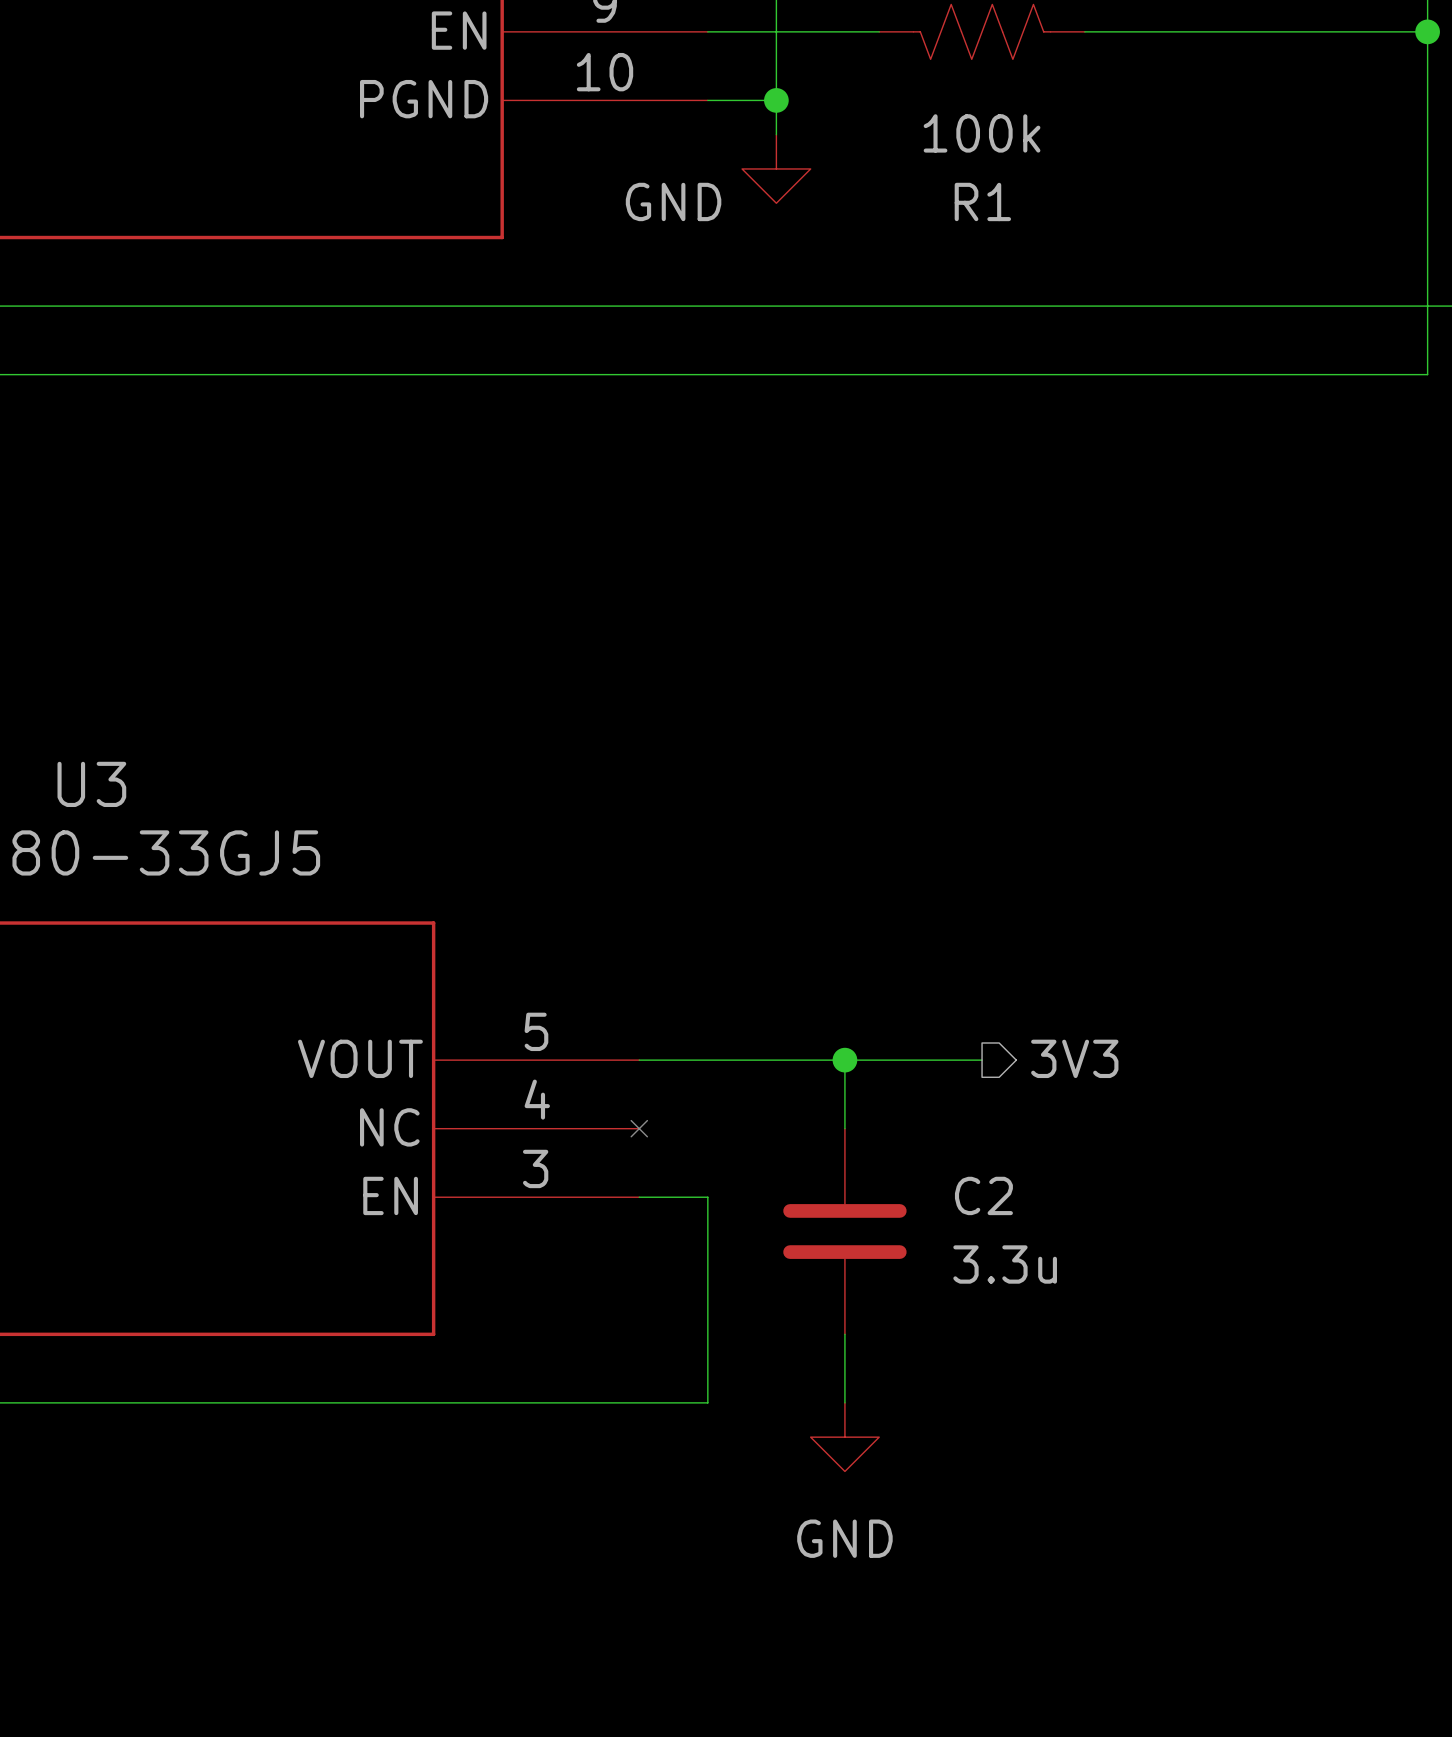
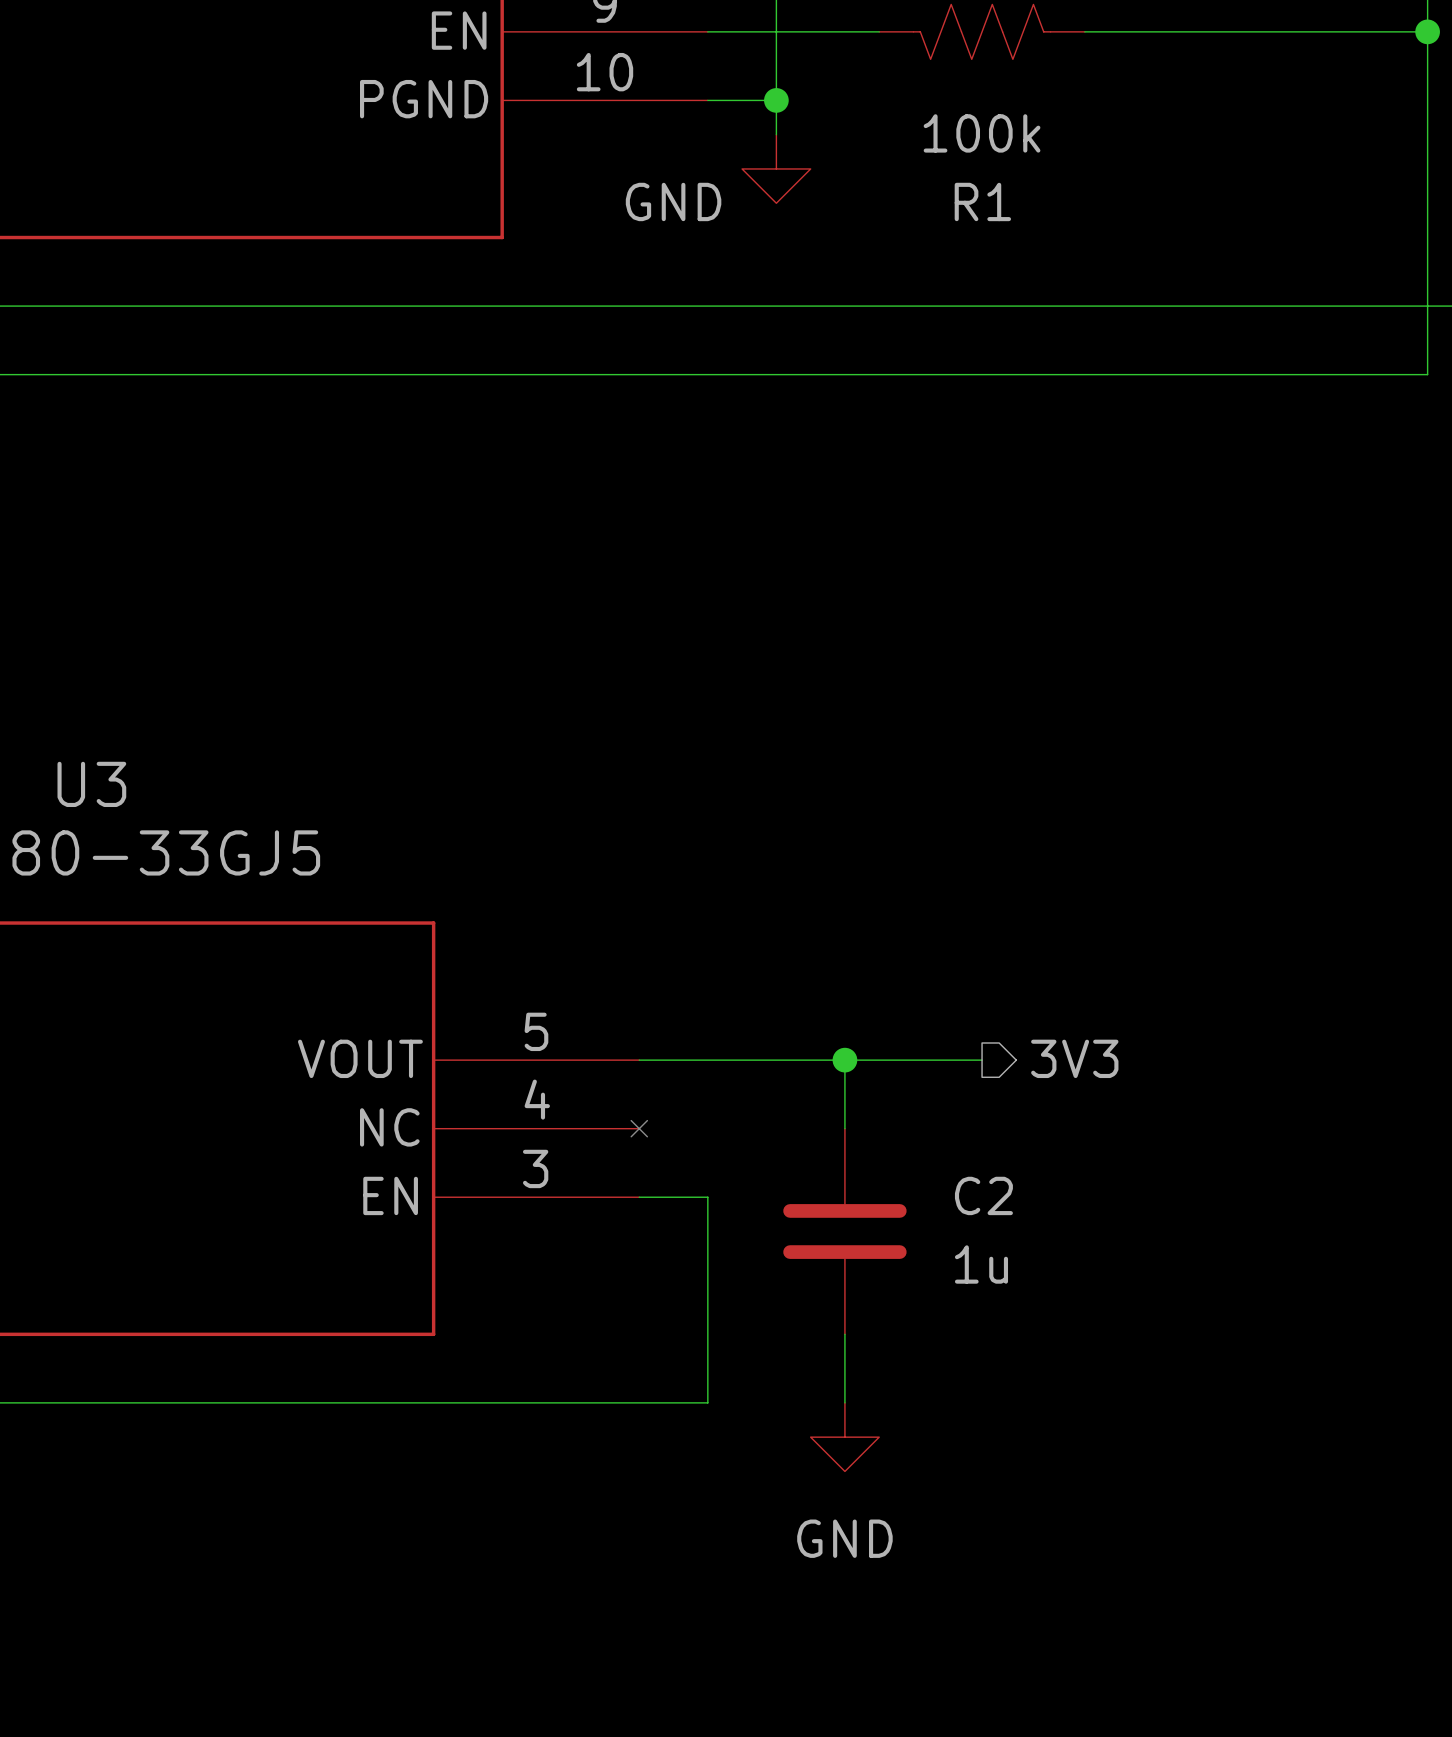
C2 value: 3.3u (1005, 1264) -> 1u (981, 1264)

